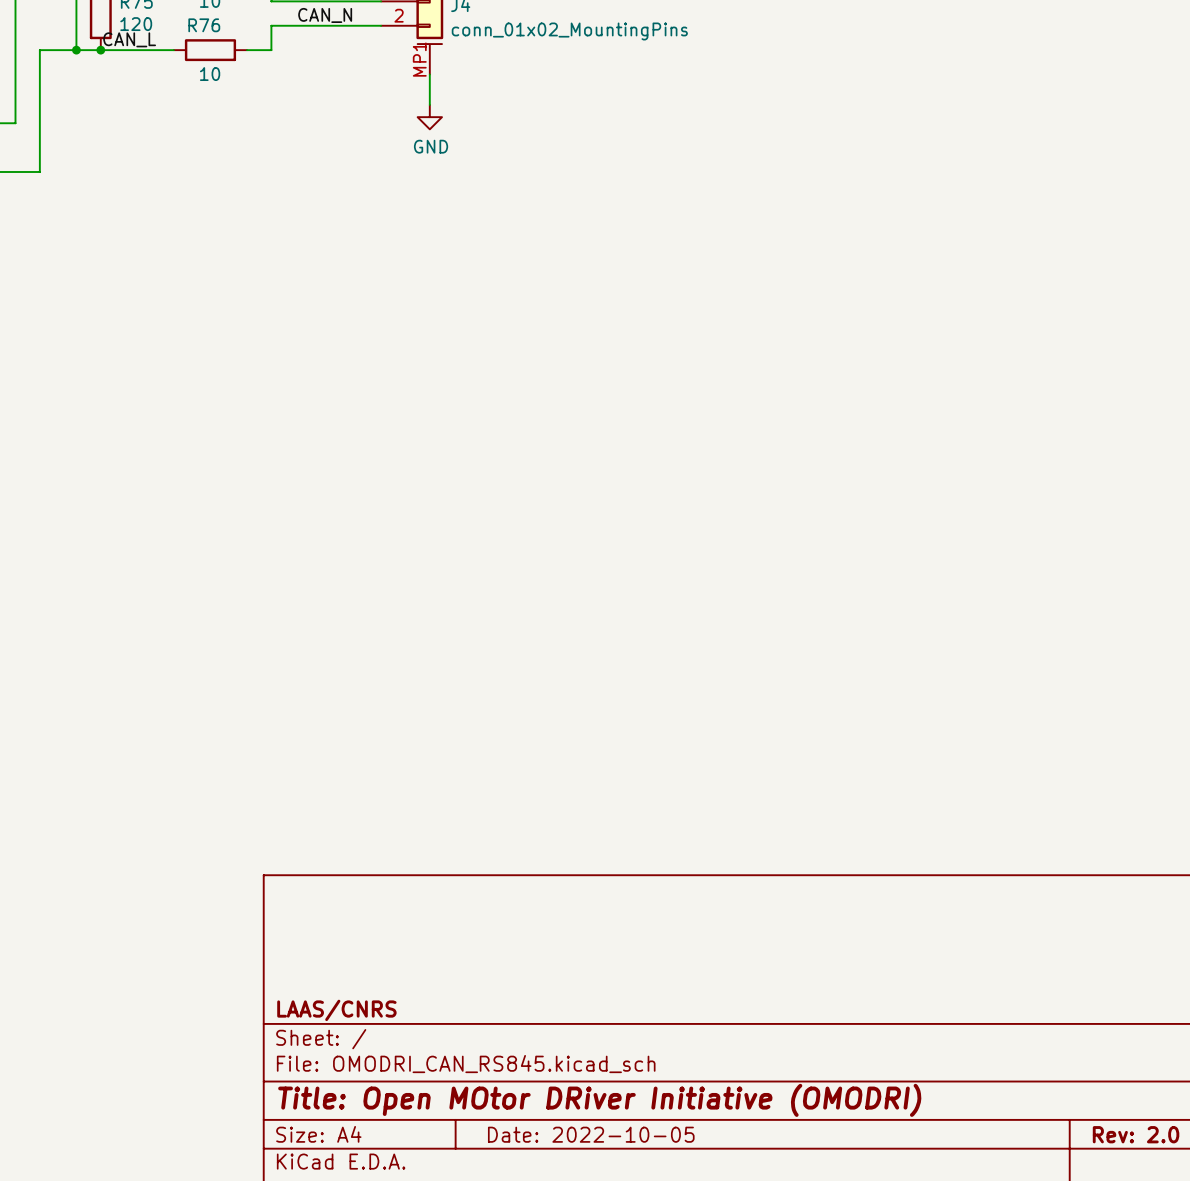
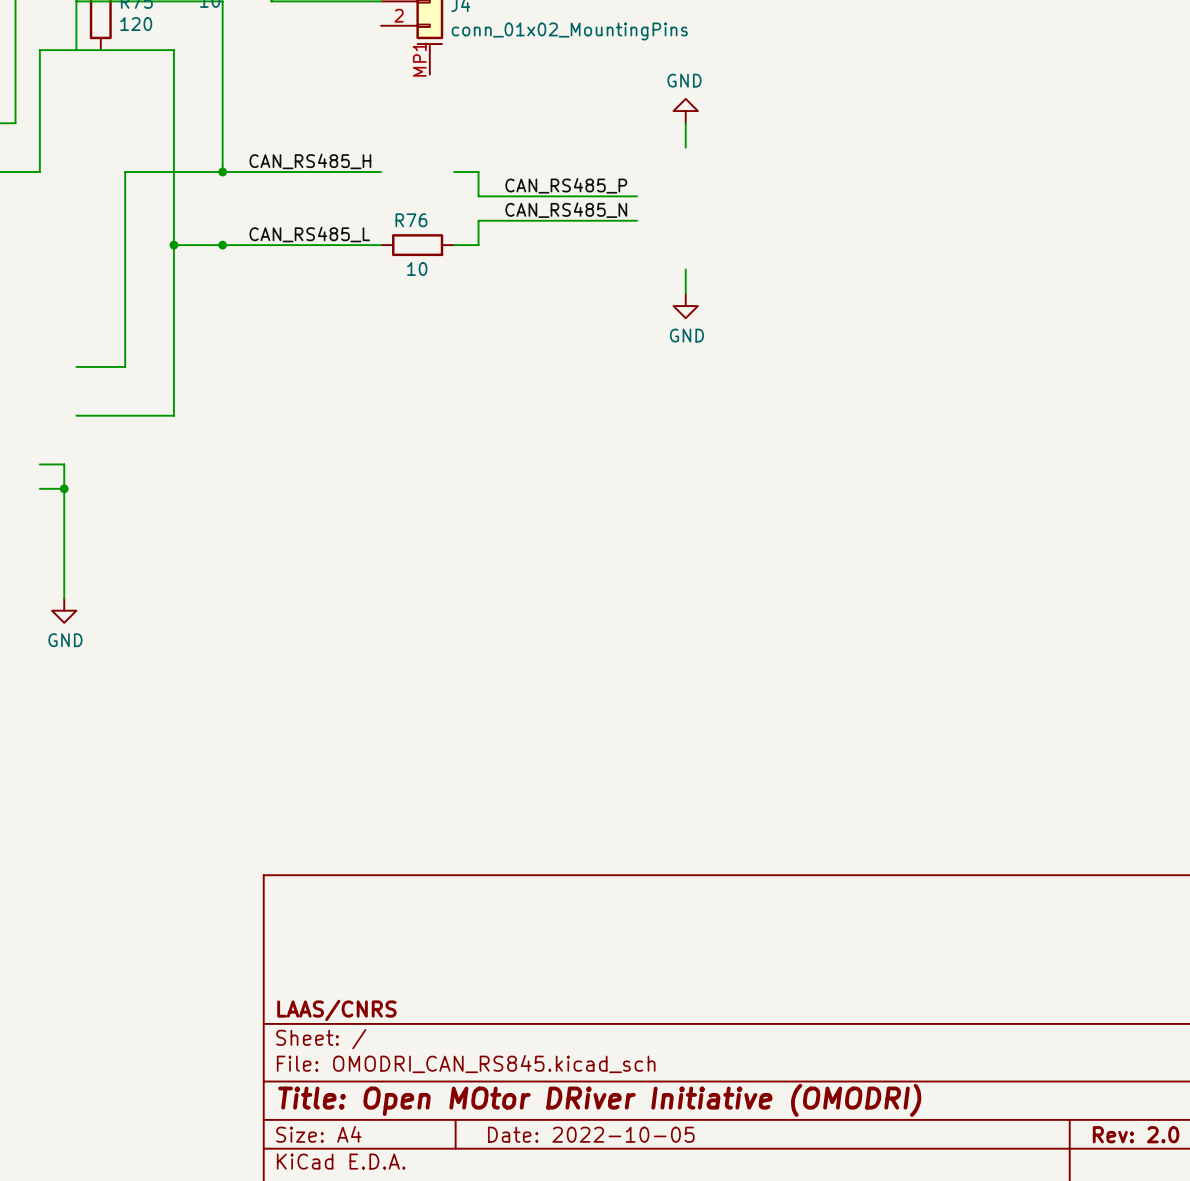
wire: none -> (76, 1) (222, 1) (222, 171)
label: CAN_N (325, 15) -> none
wire: (381, 25) (271, 25) (271, 50) (247, 50) -> none
label: CAN_L (129, 39) -> none
junction: (76, 50) -> none
junction: (100, 50) -> none
wire: none -> (173, 50) (173, 415) (76, 415)
R76 position: (210, 50) -> (417, 245)
wire: (429, 74) (429, 104) -> none
power symbol: none -> GND (685, 111)
power symbol: GND (429, 117) -> none
wire: none -> (685, 123) (685, 147)
label: none -> CAN_RS485_H (310, 161)
junction: none -> (222, 171)
wire: none -> (381, 171) (125, 171) (125, 366) (76, 366)
wire: none -> (454, 171) (478, 171) (478, 196) (636, 196)
label: none -> CAN_RS485_P (566, 185)
label: none -> CAN_RS485_N (566, 210)
wire: none -> (636, 220) (478, 220) (478, 245) (454, 245)
label: none -> CAN_RS485_L (309, 234)
wire: none -> (173, 245) (381, 245)
junction: none -> (173, 245)
junction: none -> (222, 245)
wire: none -> (685, 269) (685, 293)
power symbol: none -> GND (685, 306)
wire: none -> (39, 464) (64, 464) (64, 598)
wire: none -> (39, 488) (64, 488)
junction: none -> (64, 488)
power symbol: none -> GND (64, 610)

